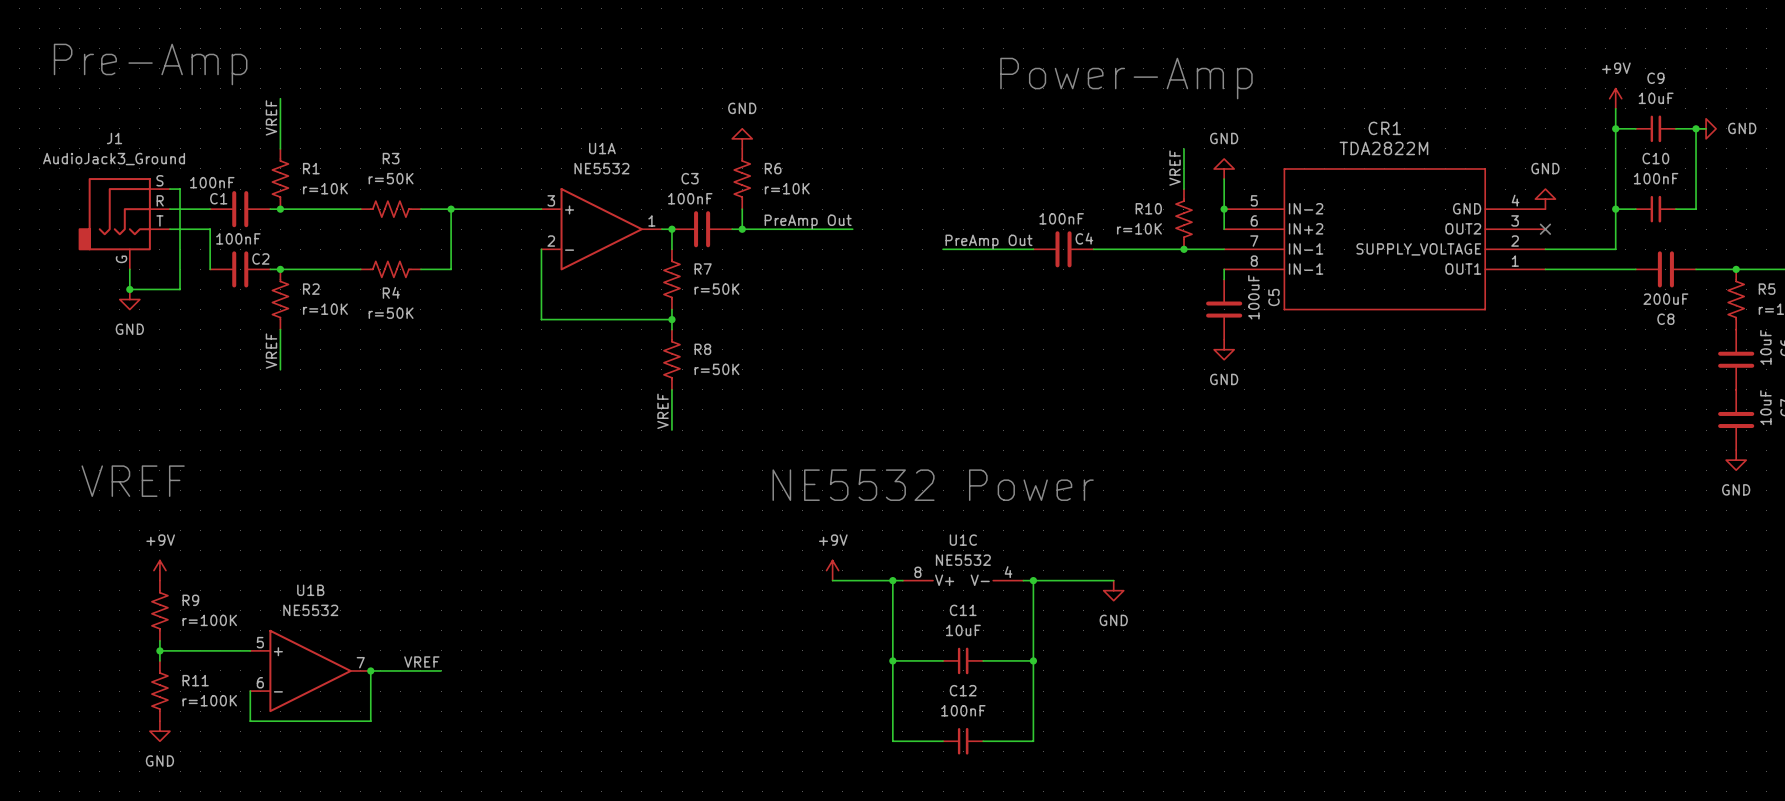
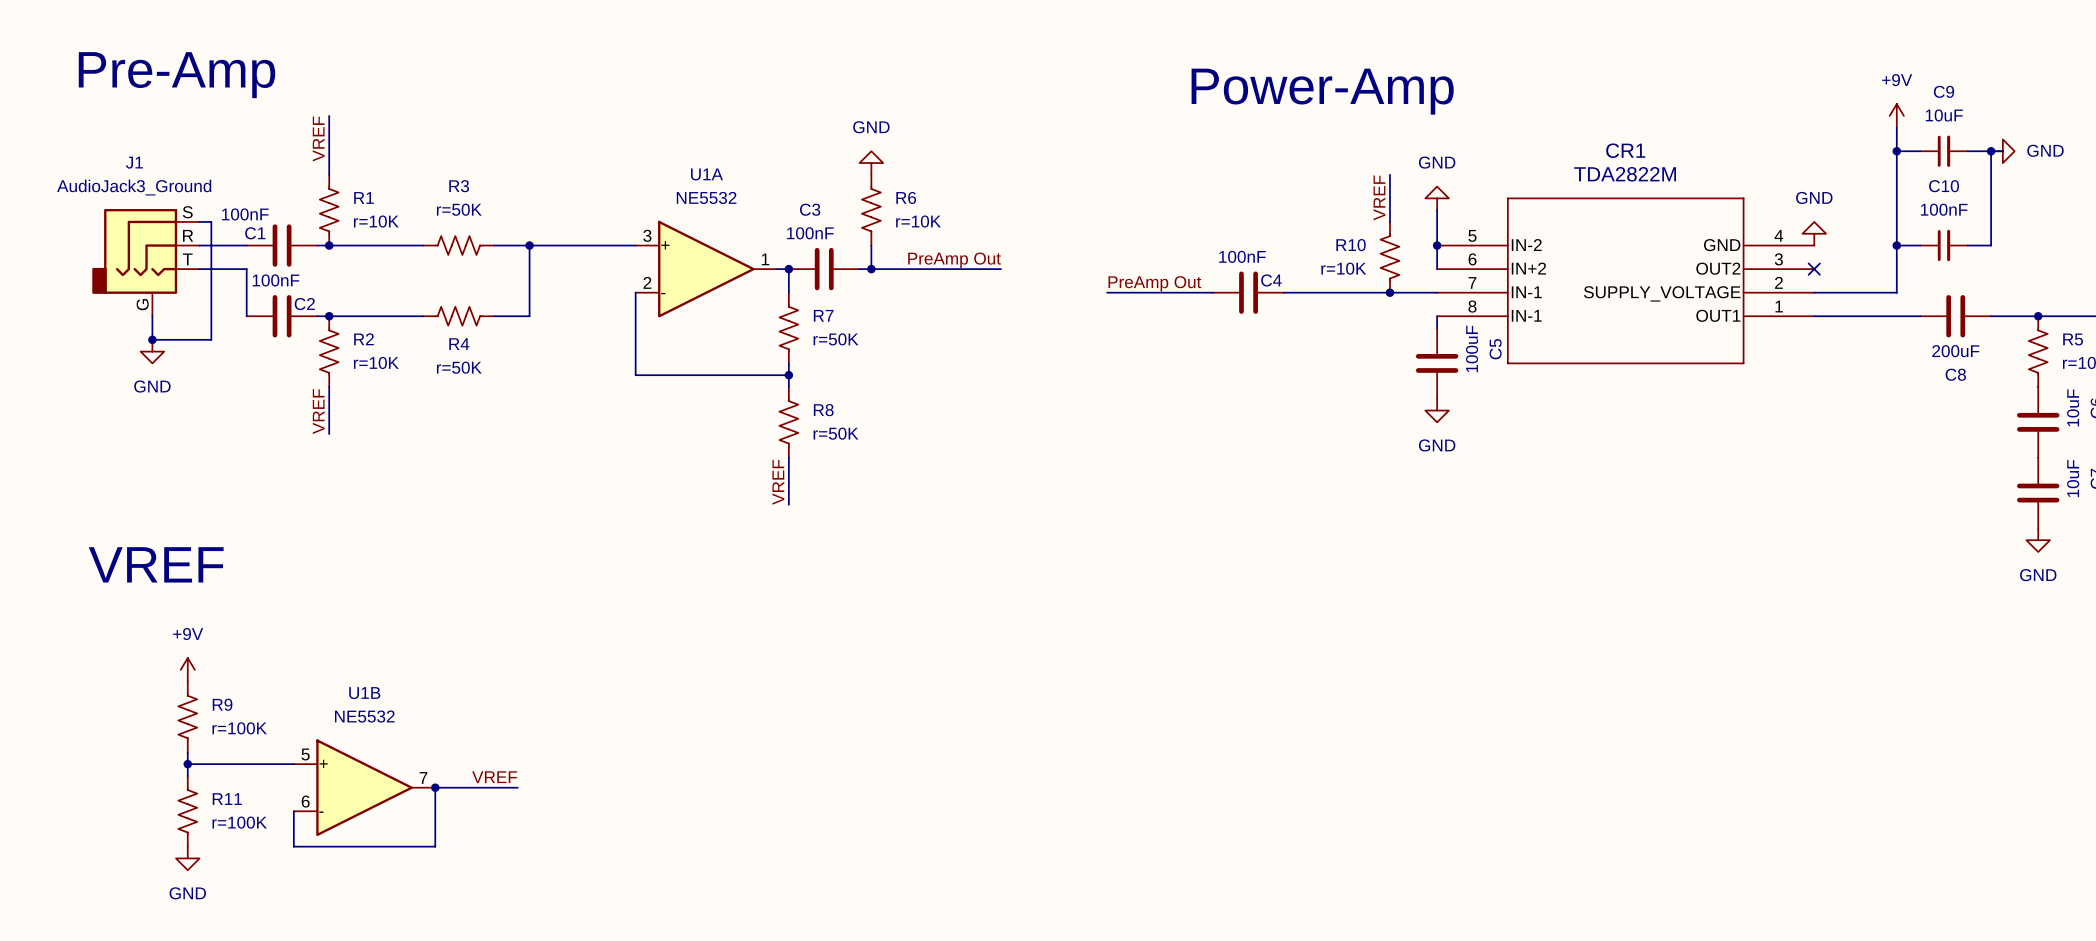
text: NE5532 Power (933, 485) -> none
power symbol: +9V (832, 570) -> none
wire: (832, 580) (902, 580) -> none
wire: (892, 580) (892, 741) (943, 741) -> none
junction: (892, 580) -> none
U1C: NE5532 (963, 580) -> none
wire: (1023, 580) (1113, 580) -> none
wire: (1033, 580) (1033, 741) (983, 741) -> none
junction: (1033, 580) -> none
power symbol: GND (1113, 590) -> none
wire: (892, 660) (943, 660) -> none
junction: (892, 660) -> none
C11: 10uF (963, 660) -> none
wire: (983, 660) (1033, 660) -> none
junction: (1033, 660) -> none
C12: 100nF (963, 741) -> none

